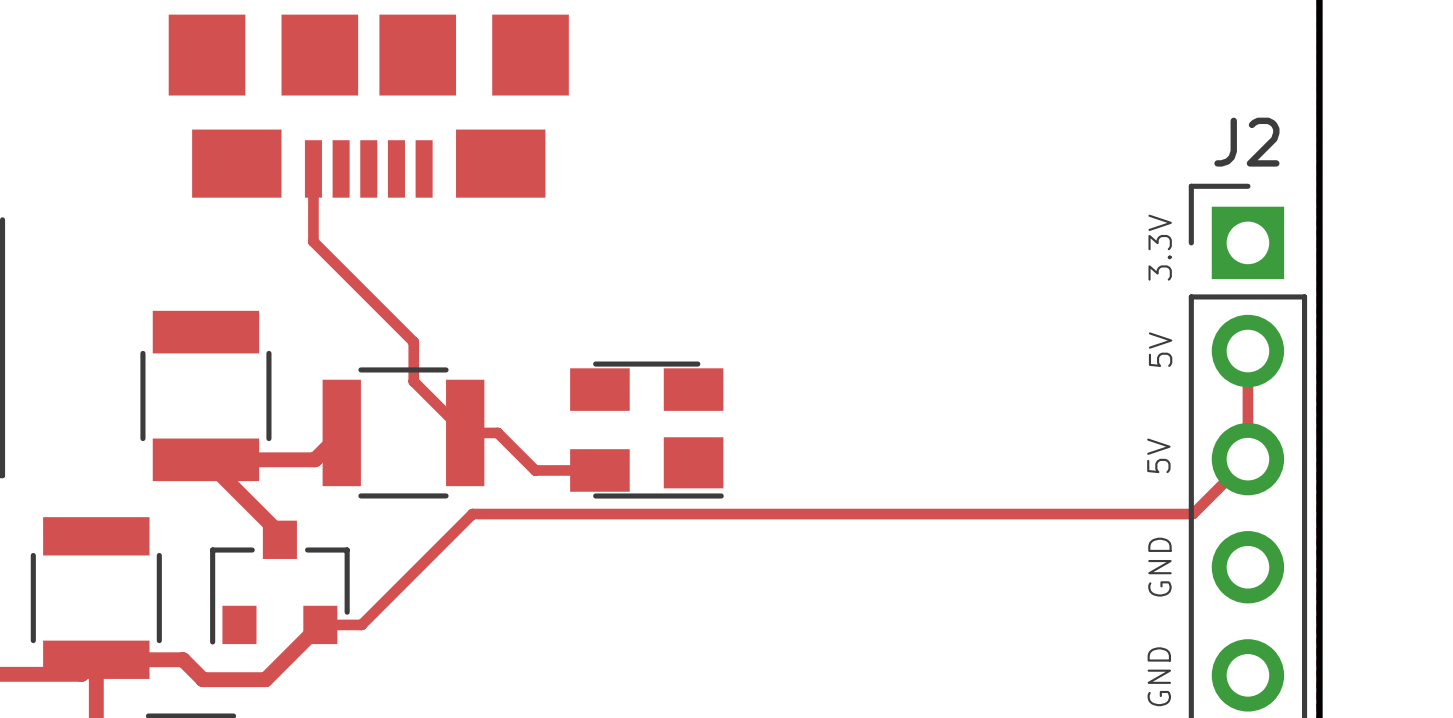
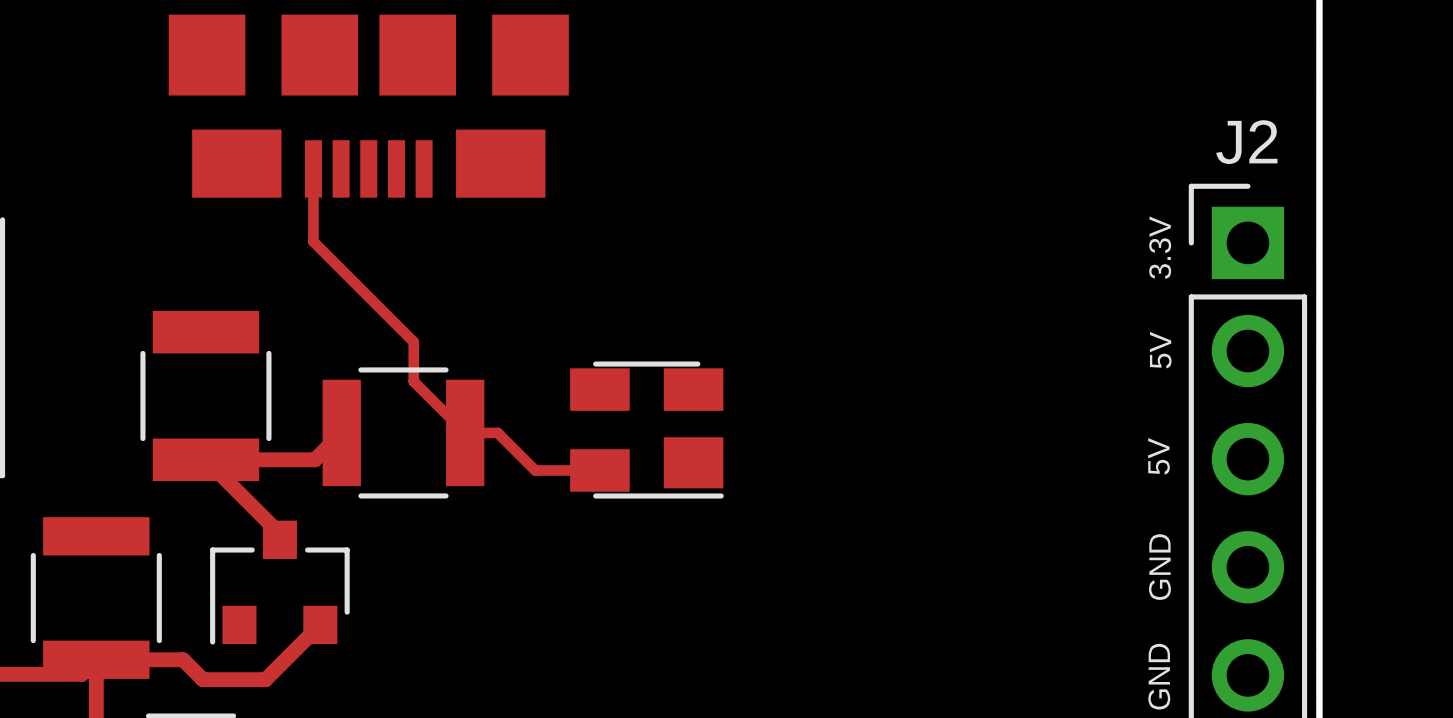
track: (1247, 351) (1247, 459) (1193, 514) (472, 514) (361, 624) (320, 624) -> none

